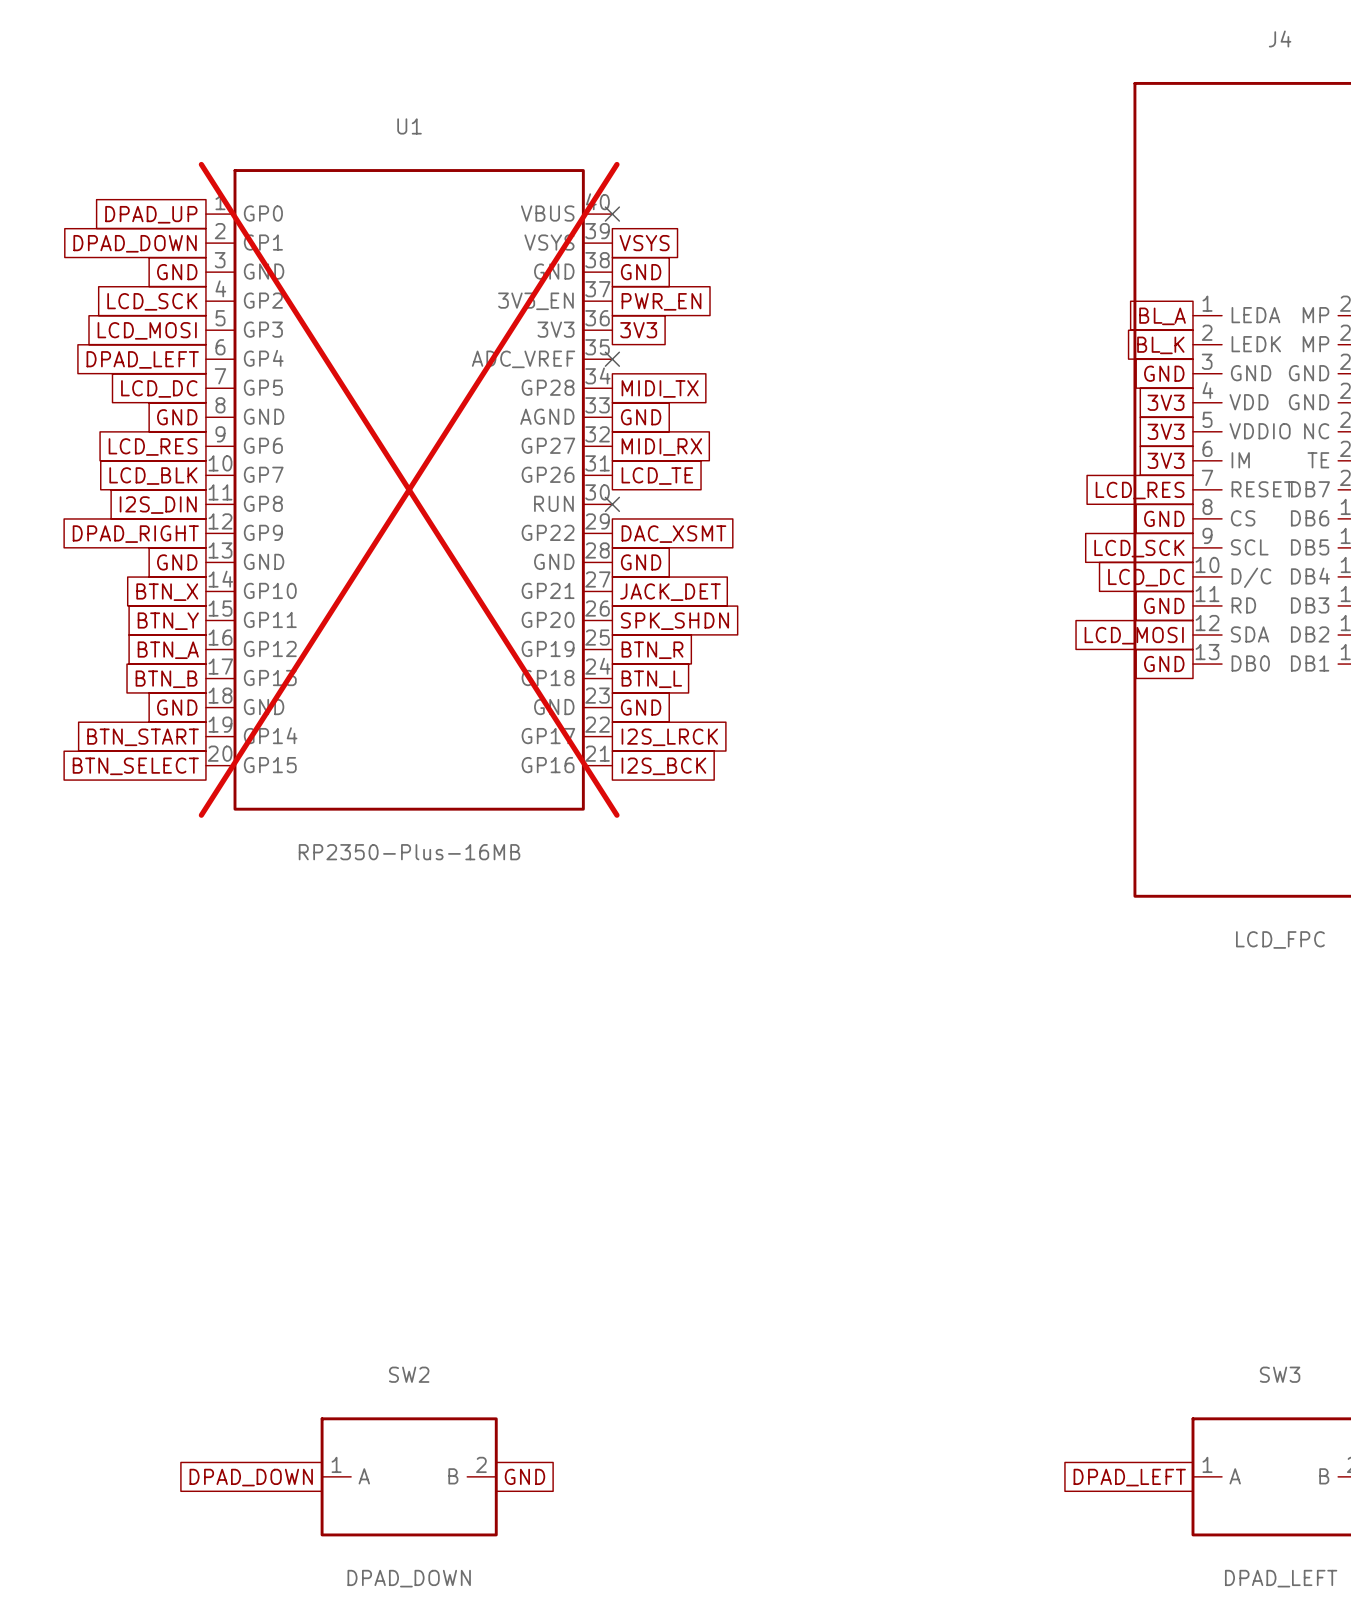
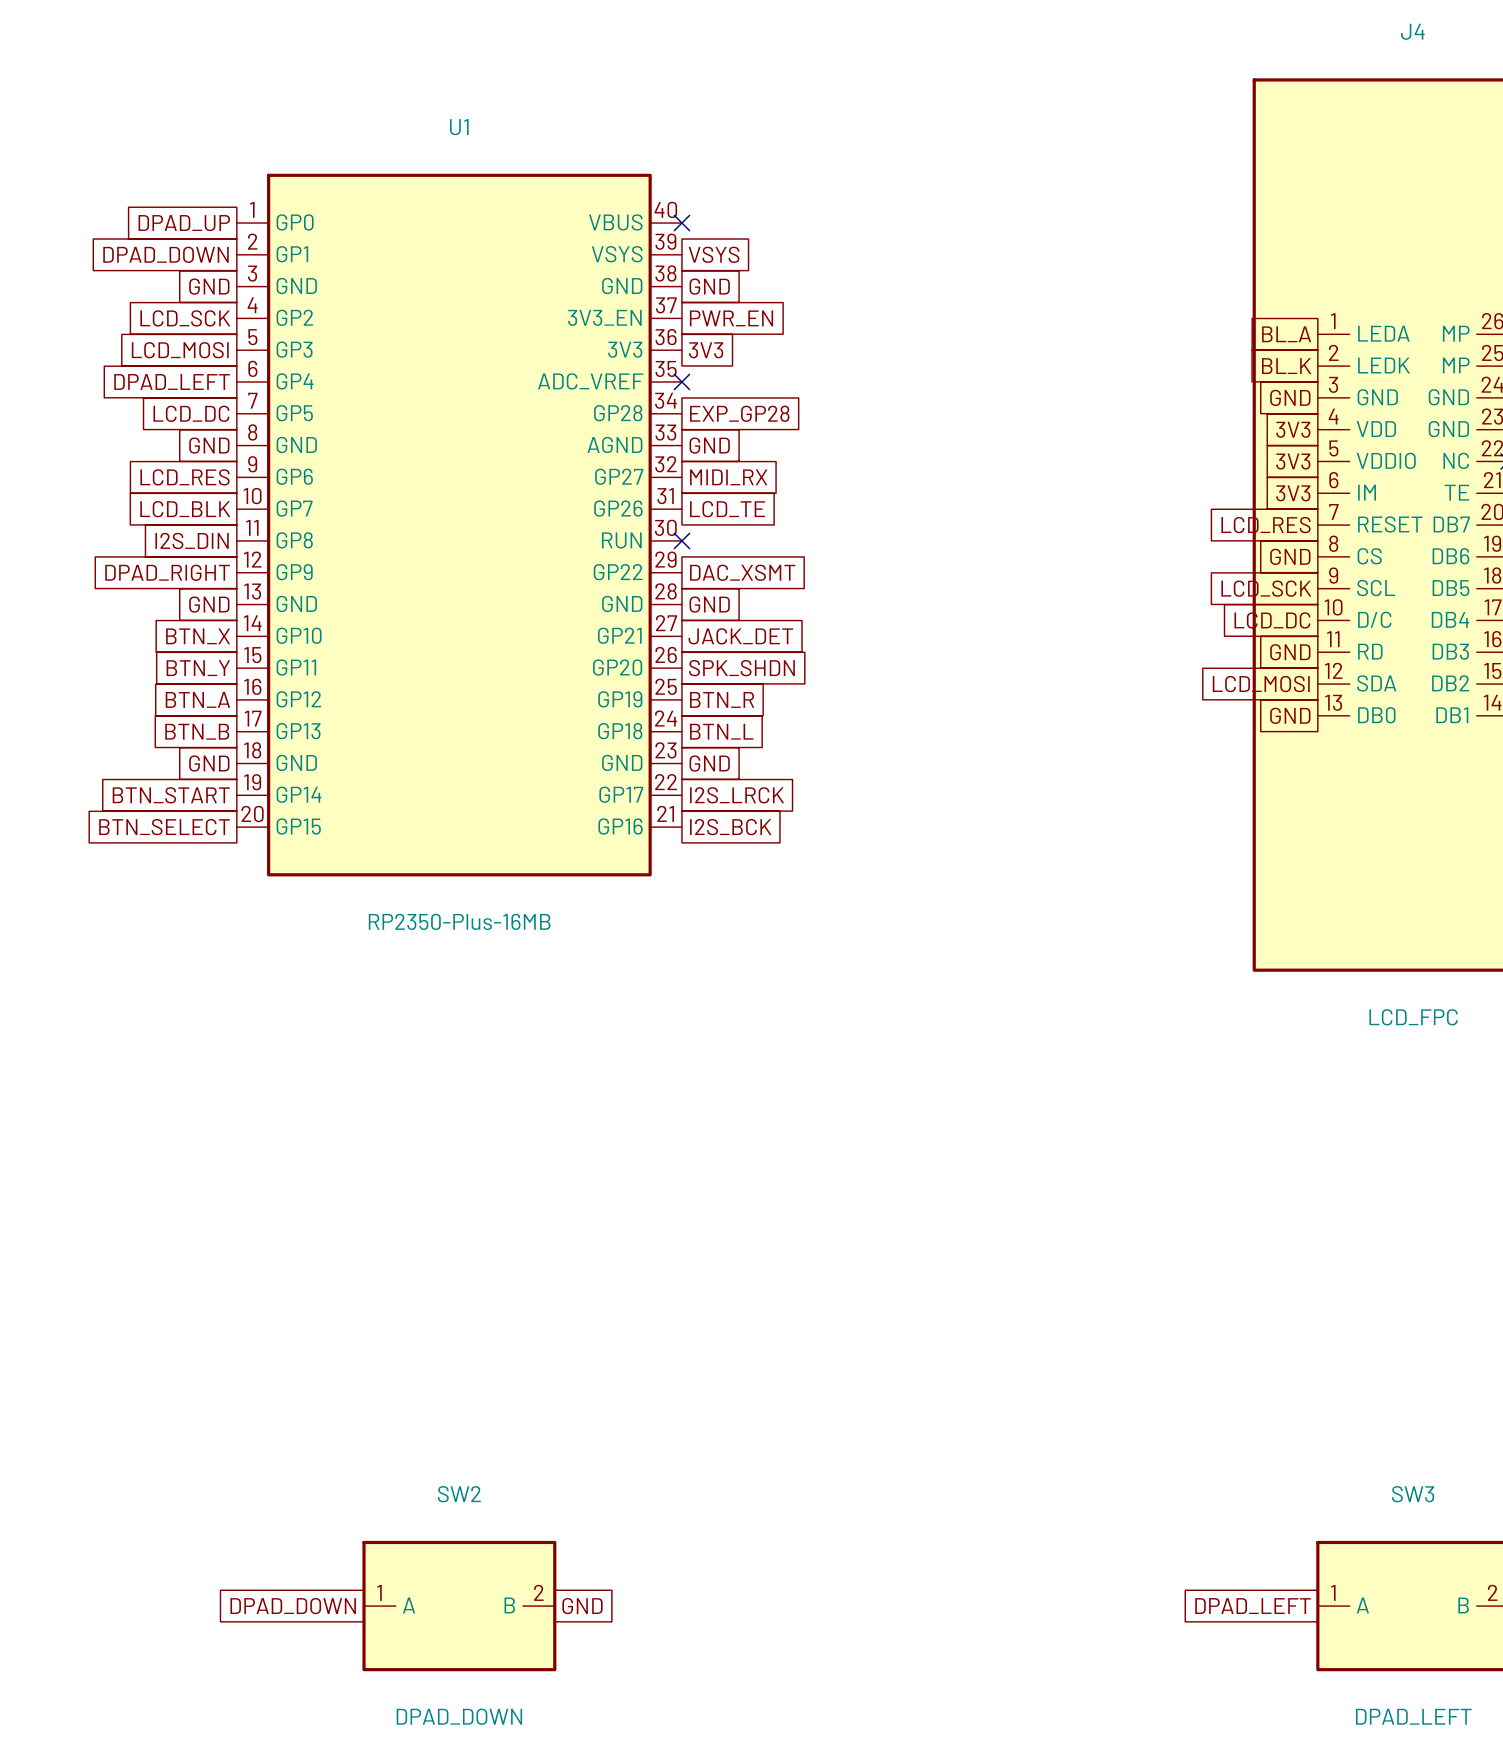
global label: MIDI_TX (660, 388) -> EXP_GP28 (739, 413)
U1 do-not-place cross: (409, 489) -> none

